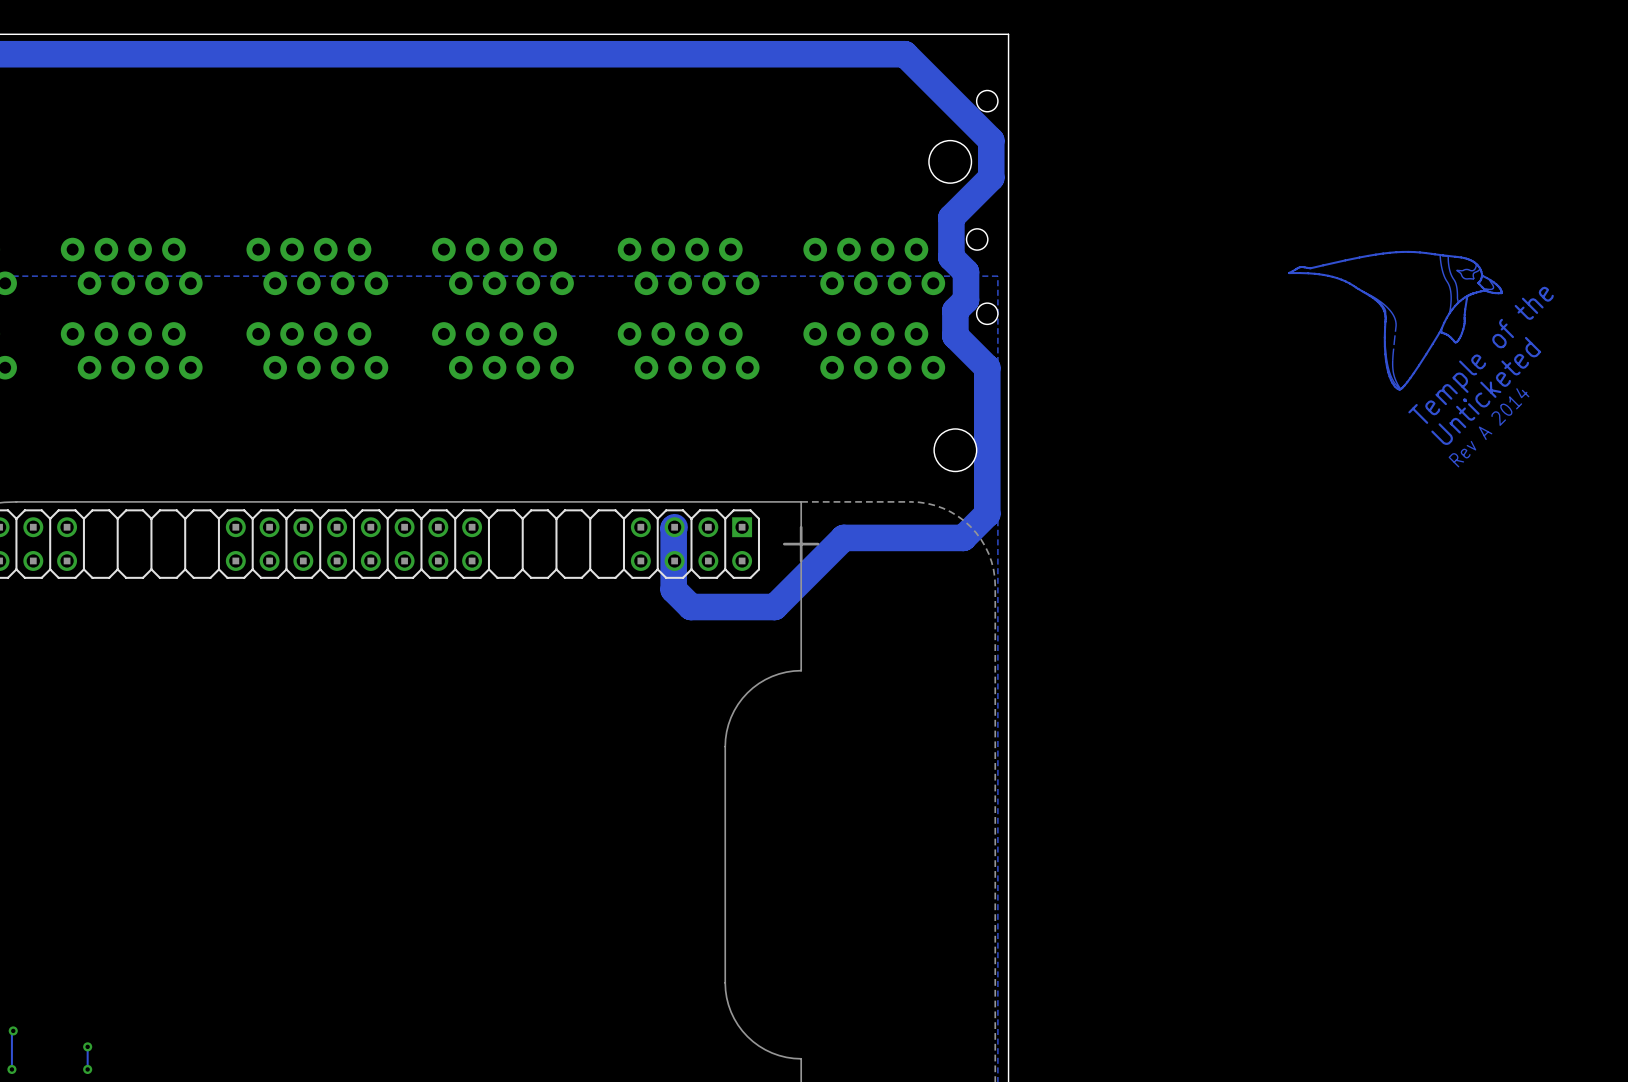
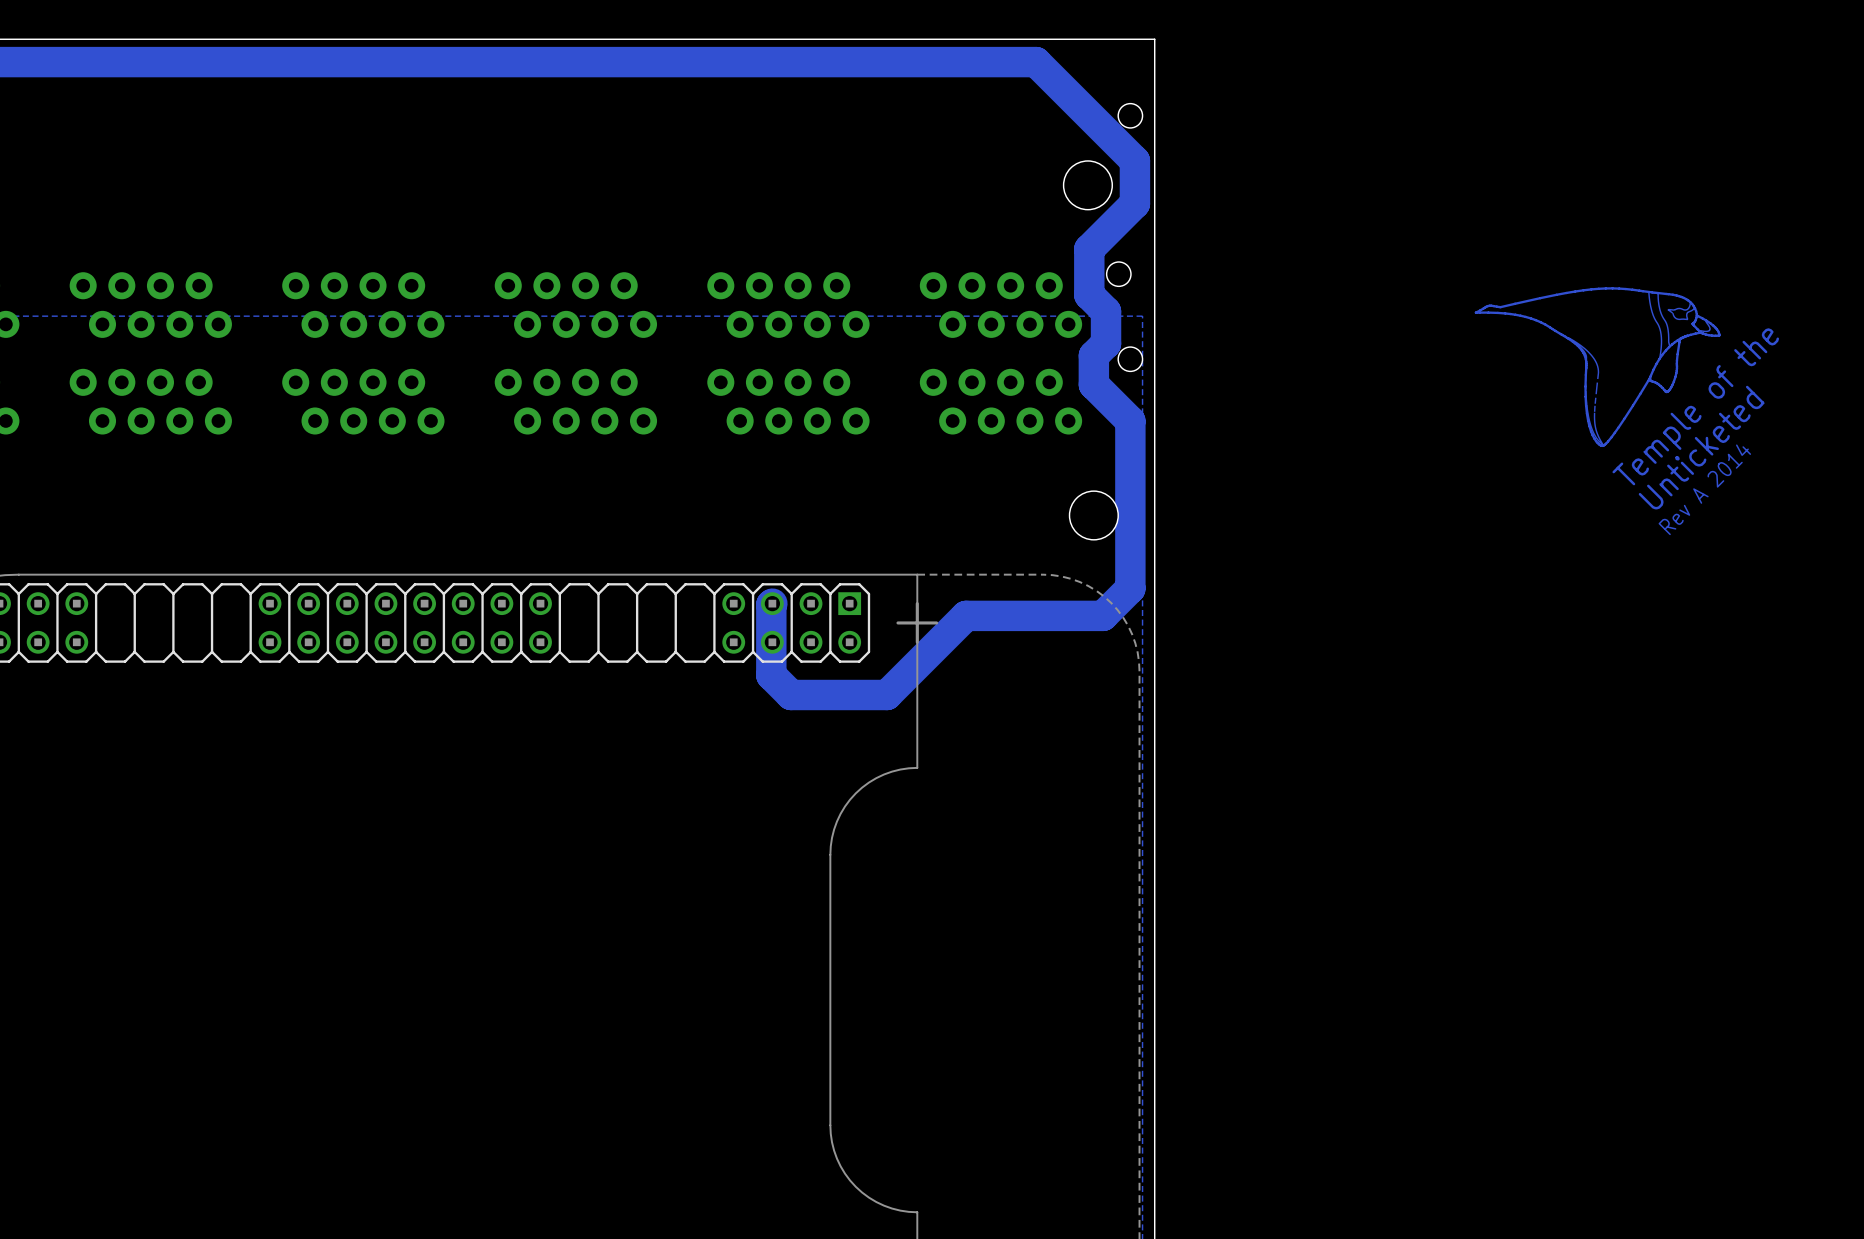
track: (13, 1030) (11, 1069) -> none
via: (13, 1030) -> none
track: (87, 1046) (87, 1069) -> none
via: (87, 1046) -> none
via: (11, 1069) -> none
via: (87, 1069) -> none

